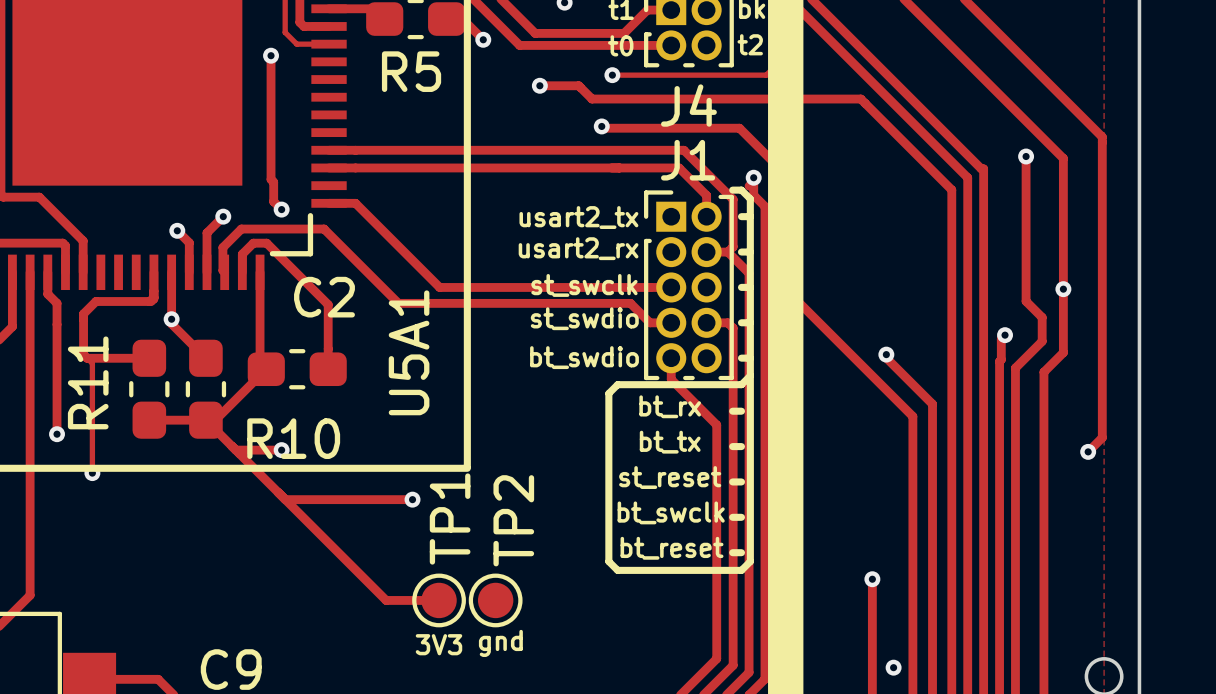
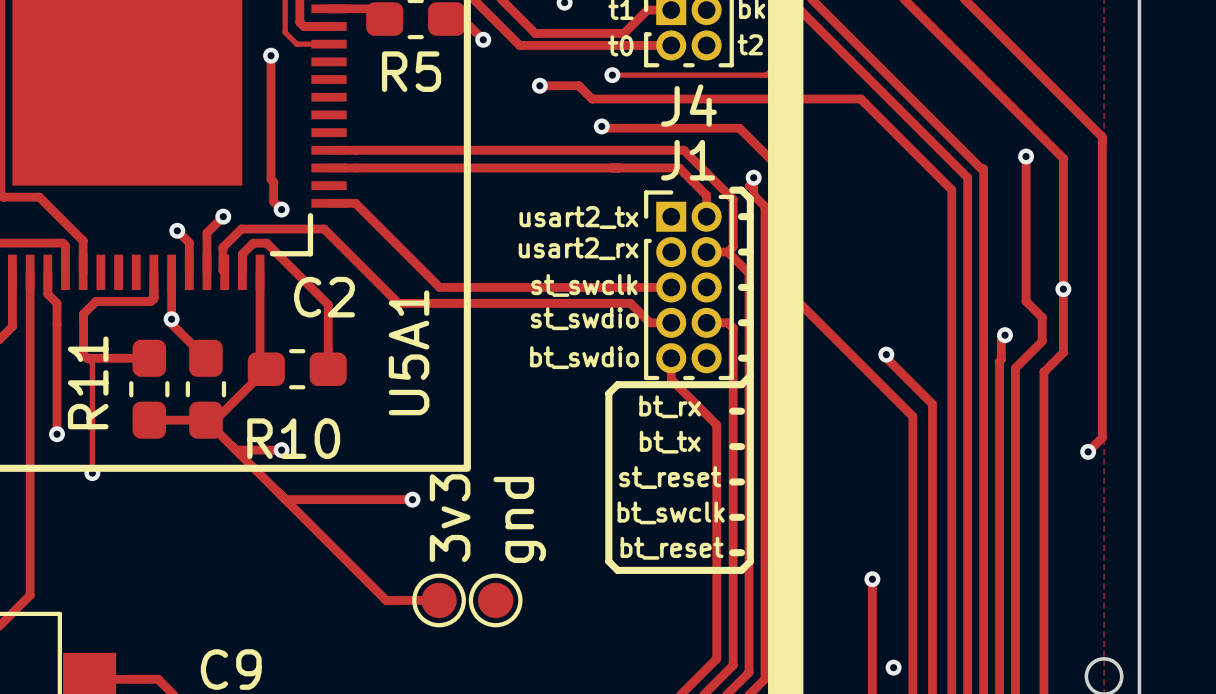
TP1 name: TP1 (450, 519) -> 3v3 (450, 518)
TP2 name: TP2 (513, 520) -> gnd (519, 519)
text: gnd (500, 643) -> none
text: 3V3 (438, 644) -> none

